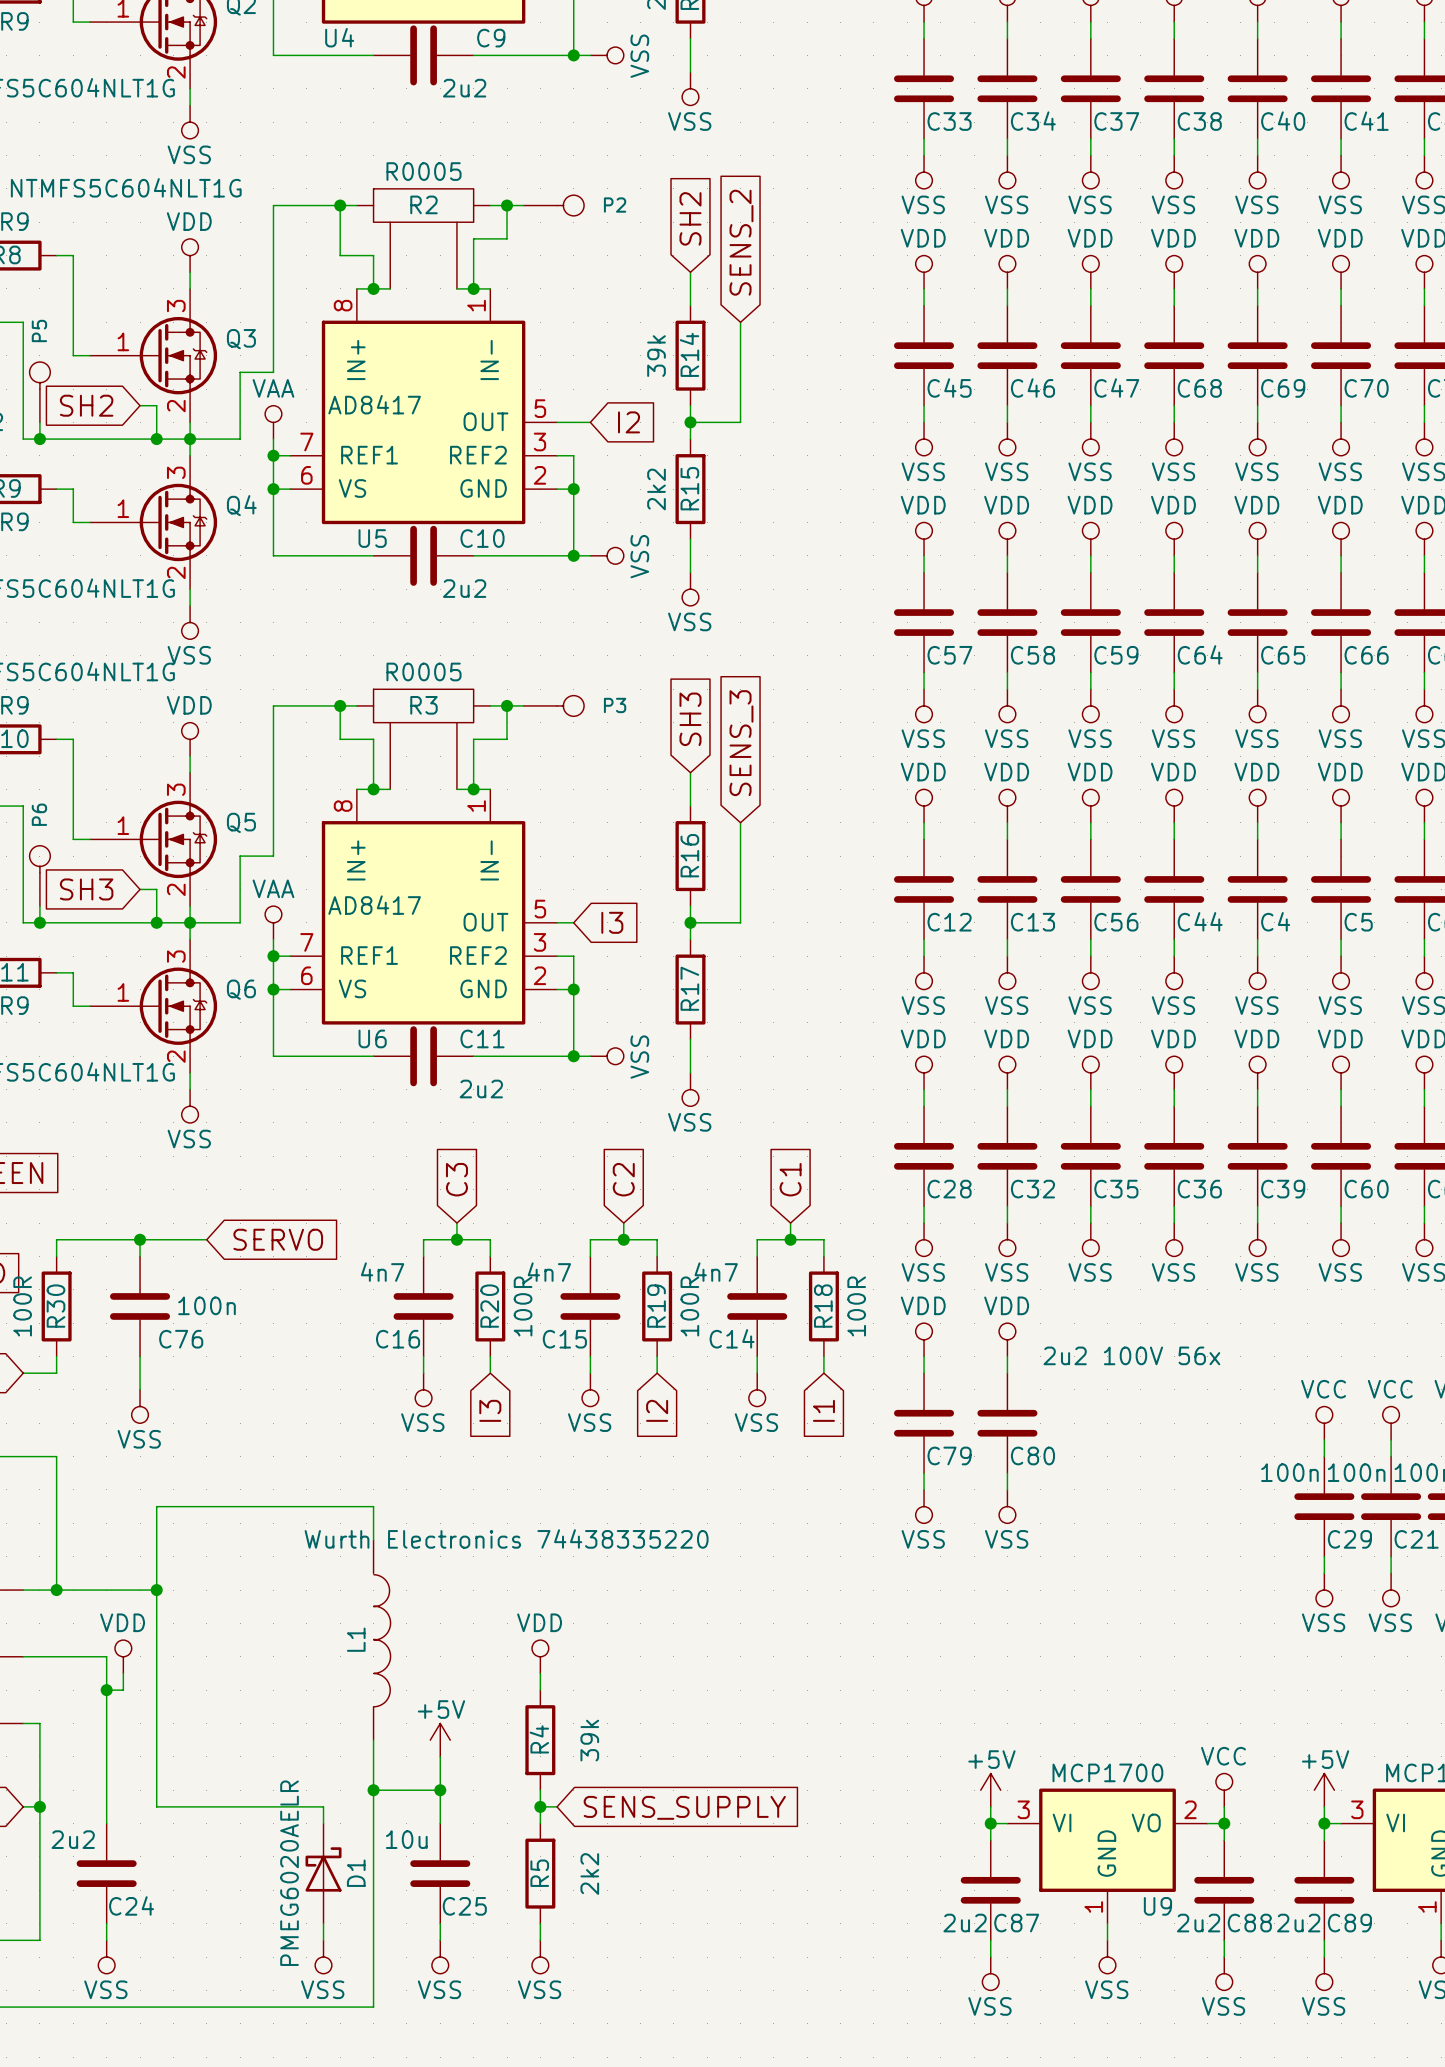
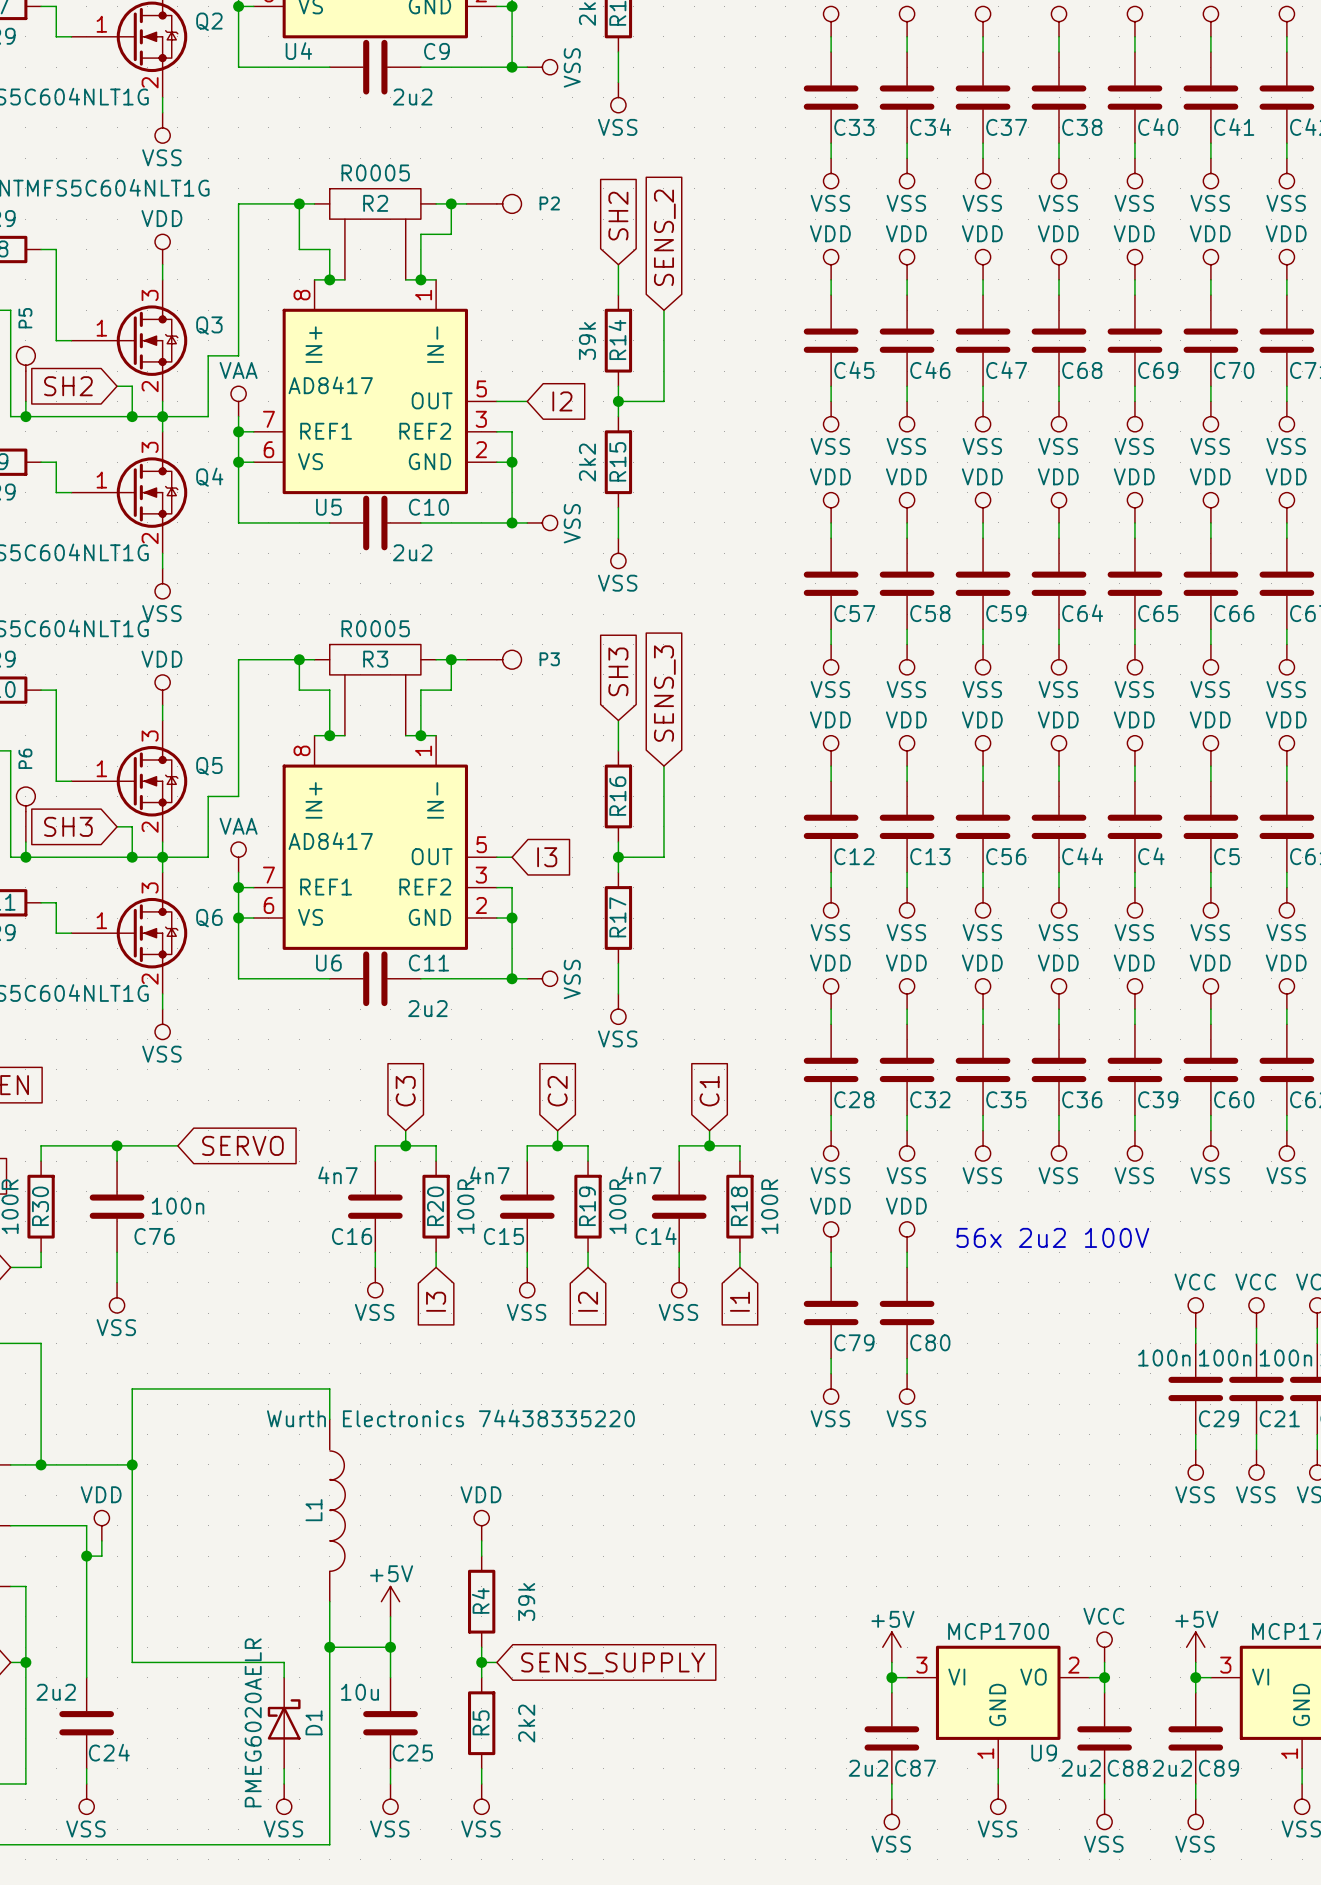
text: none -> 56x 2u2 100V (1052, 1237)
C80 value: 2u2 100V 56x (1131, 1355) -> none

